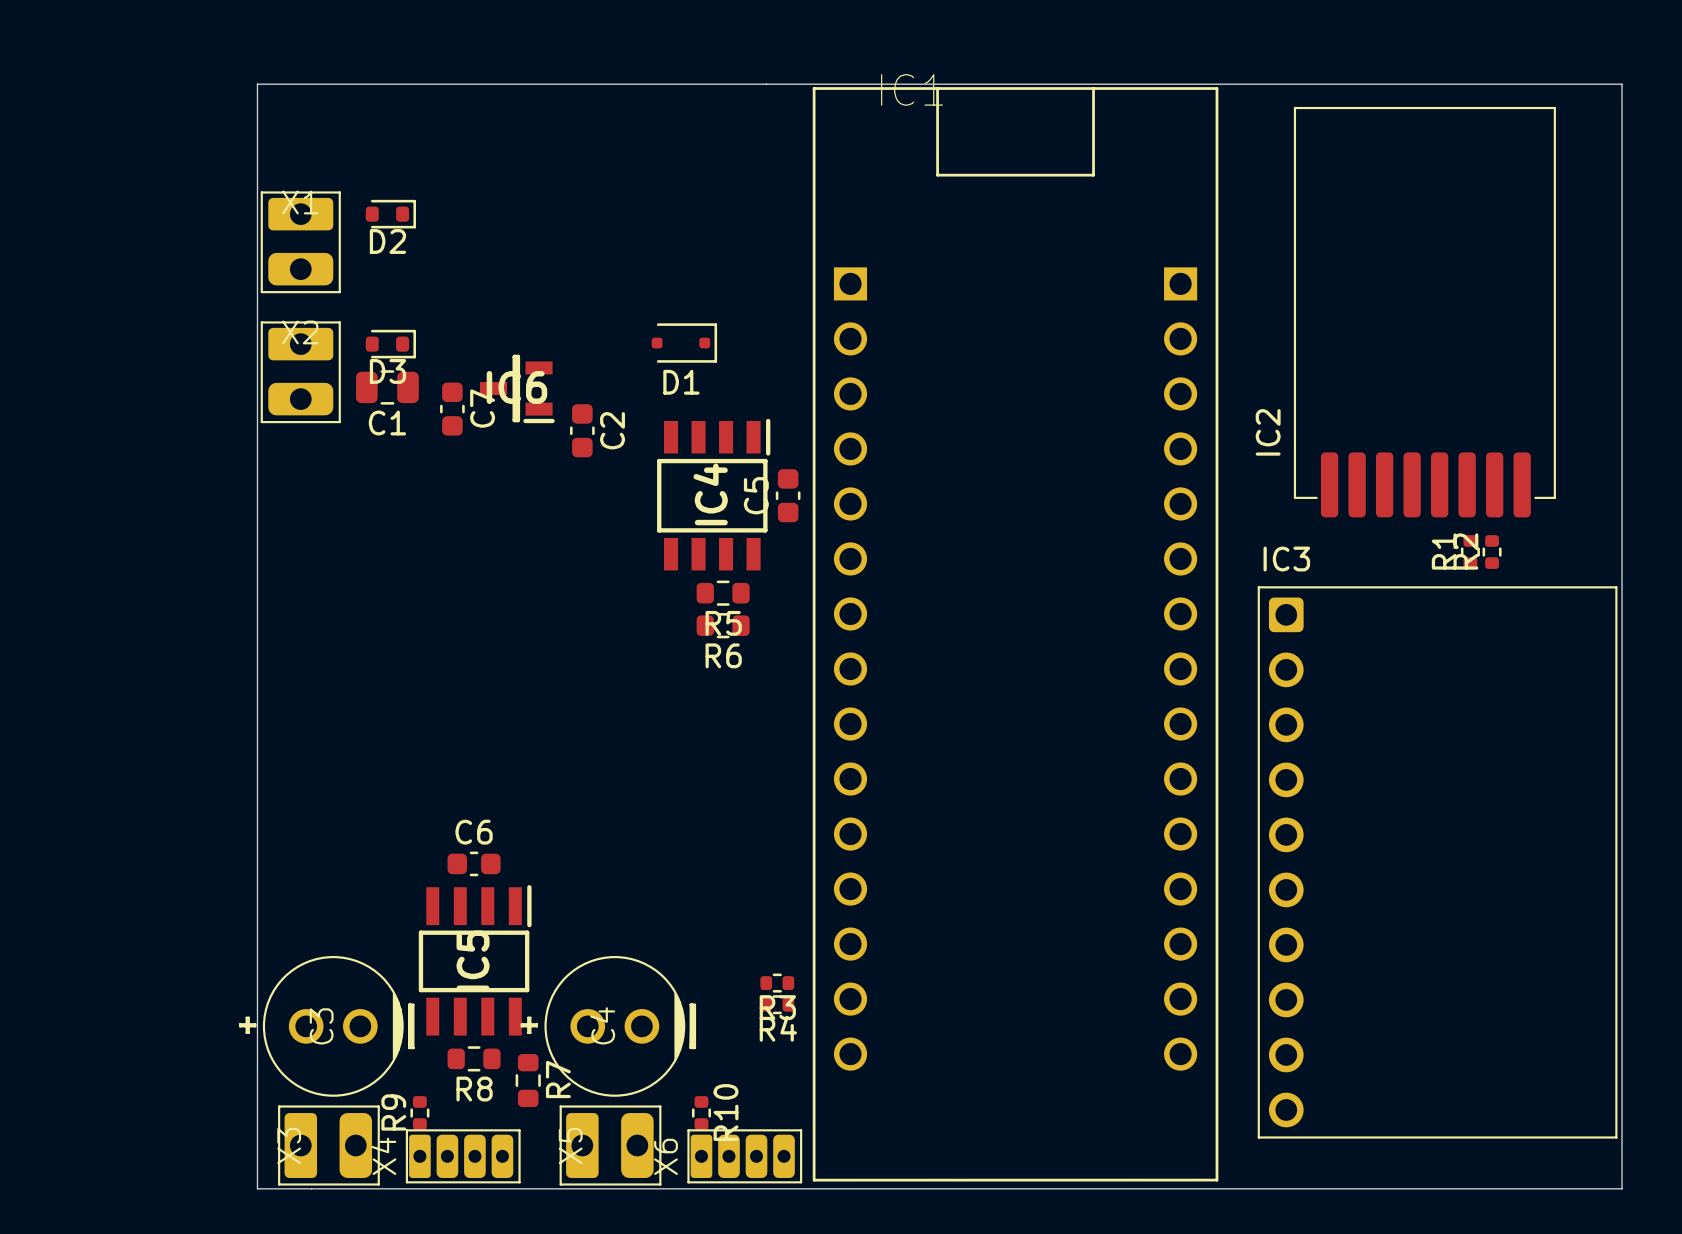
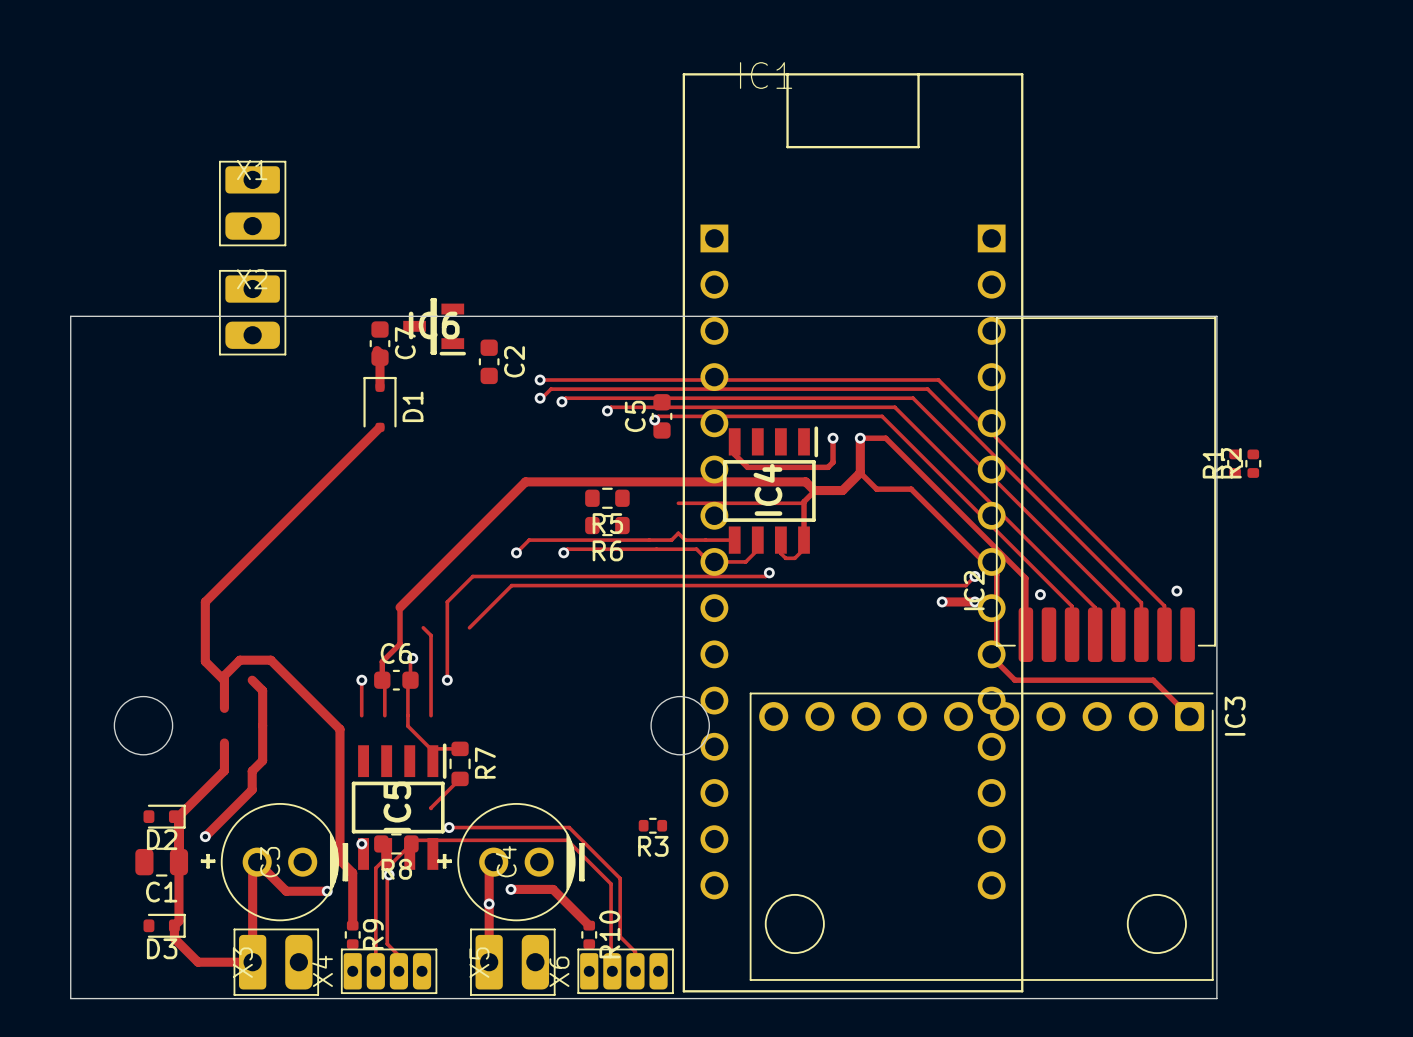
D2 position: (390, 214) -> (164, 816)
IC2 position: (1424, 312) -> (1105, 489)
D1 rotation: 0° (684, 343) -> 90° counterclockwise (380, 404)
D1 position: (684, 343) -> (380, 404)
D3 position: (390, 344) -> (164, 925)
C1 position: (387, 387) -> (161, 862)
track: none -> (377, 350) (380, 353) (380, 387)
track: none -> (540, 380) (938, 380) (1164, 605) (1164, 634)
via: none -> (540, 380)
track: none -> (540, 398) (551, 389) (927, 389) (1141, 602) (1141, 634)
via: none -> (540, 398)
track: none -> (561, 401) (565, 398) (913, 398) (1118, 603) (1118, 634)
via: none -> (561, 401)
track: none -> (607, 410) (611, 407) (894, 407) (1095, 607) (1095, 634)
via: none -> (607, 410)
IC4 position: (713, 494) -> (770, 490)
track: none -> (654, 420) (658, 416) (882, 416) (1072, 606) (1072, 634)
via: none -> (654, 420)
track: none -> (380, 427) (205, 601) (205, 661) (224, 680) (224, 708)
track: none -> (833, 438) (833, 462) (828, 467) (747, 467) (734, 454) (734, 441)
via: none -> (833, 438)
via: none -> (860, 438)
IC3 name position: IC3 (1286, 559) -> IC3 (1235, 716)
track: none -> (860, 472) (842, 490) (814, 490) (805, 481) (525, 481) (400, 607) (400, 644) (382, 661) (382, 680) (384, 682) (384, 715)
track: none -> (860, 472) (860, 438) (885, 438) (1025, 578) (1025, 634)
track: none -> (860, 472) (876, 489) (911, 489) (996, 574) (996, 662) (1014, 680) (1153, 680) (1189, 716)
track: none -> (815, 490) (804, 501)
IC3 footprint: [1257, 586, 1618, 1139] -> [749, 692, 1214, 981]
track: none -> (804, 501) (678, 503)
track: none -> (804, 501) (804, 549) (794, 558) (785, 558) (780, 553) (780, 540)
track: none -> (734, 540) (685, 540) (678, 533) (671, 540) (529, 540) (516, 552)
track: none -> (757, 540) (757, 549) (745, 561) (712, 561) (696, 549) (567, 549) (563, 552)
via: none -> (516, 552)
via: none -> (563, 552)
track: none -> (769, 572) (765, 576) (472, 576) (447, 601) (447, 680)
via: none -> (769, 572)
track: none -> (974, 576) (965, 585) (511, 585) (469, 627)
via: none -> (974, 576)
via: none -> (1176, 591)
via: none -> (1040, 594)
track: none -> (942, 601) (974, 601)
via: none -> (942, 601)
via: none -> (974, 601)
track: none -> (423, 627) (431, 635) (431, 715)
track: none -> (412, 658) (410, 660) (410, 680) (407, 682) (407, 726) (430, 748) (460, 748)
via: none -> (412, 658)
track: none -> (224, 680) (224, 676) (239, 660) (270, 660) (339, 729) (339, 860) (352, 873) (352, 925)
track: none -> (252, 680) (262, 690) (262, 760) (252, 771) (252, 789) (205, 836)
track: none -> (361, 680) (361, 715)
via: none -> (361, 680)
via: none -> (447, 680)
round board edge: none -> [113, 696, 174, 756]
round board edge: none -> [650, 696, 710, 756]
C6 position: (474, 863) -> (396, 680)
track: none -> (224, 742) (224, 770) (178, 816) (178, 921) (174, 925) (174, 938) (198, 962) (252, 962) (252, 866) (257, 862) (286, 891) (327, 891)
track: none -> (460, 778) (431, 808)
track: none -> (449, 827) (569, 827) (620, 878) (620, 936) (635, 952) (635, 971)
via: none -> (449, 827)
via: none -> (205, 836)
via: none -> (361, 843)
R4: (777, 1004) -> none
track: none -> (493, 862) (489, 866) (489, 962)
track: none -> (389, 874) (387, 876) (387, 944) (398, 955) (398, 971) (394, 966)
via: none -> (389, 874)
R8 position: (474, 1058) -> (396, 843)
track: none -> (511, 889) (553, 889) (589, 925)
via: none -> (511, 889)
via: none -> (327, 891)
via: none -> (489, 903)
R7 position: (528, 1080) -> (460, 763)
R9 name position: R9 (393, 1112) -> R9 (373, 934)
track: none -> (375, 971) (375, 868) (381, 862) (393, 862) (415, 840) (567, 840) (611, 883) (612, 971)
board edge: (257, 1188) (257, 84) (1622, 84) (1622, 1188) (1448, 1188) -> (216, 998) (70, 998) (70, 316) (1216, 316) (1216, 998)

